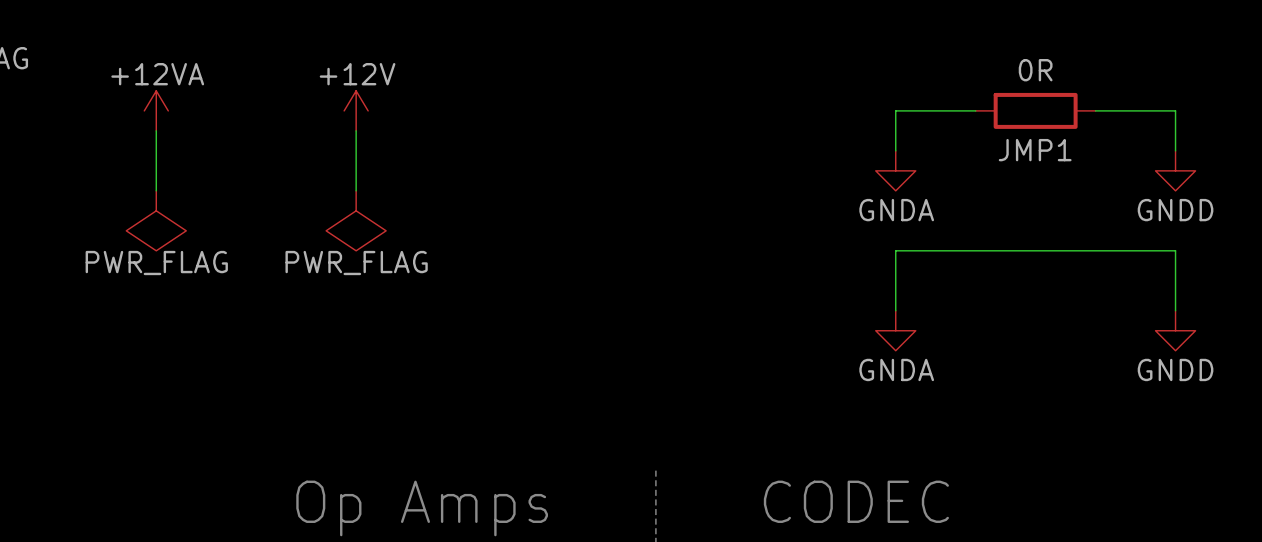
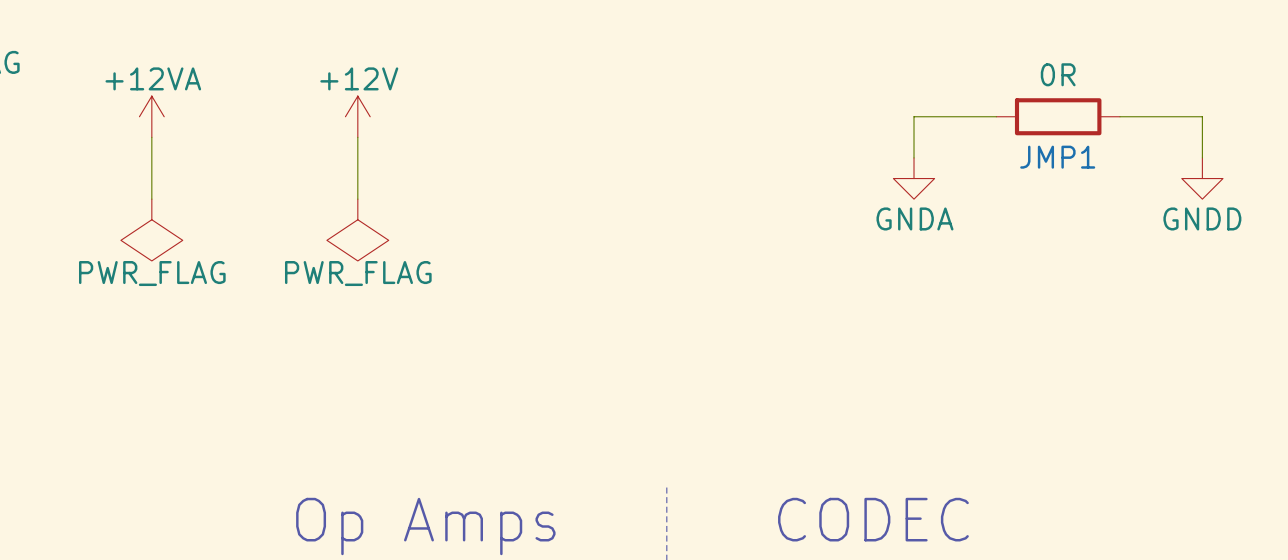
wire: (895, 310) (895, 250) (1175, 250) (1175, 310) -> none
power symbol: GNDA (895, 330) -> none
power symbol: GNDD (1175, 330) -> none

